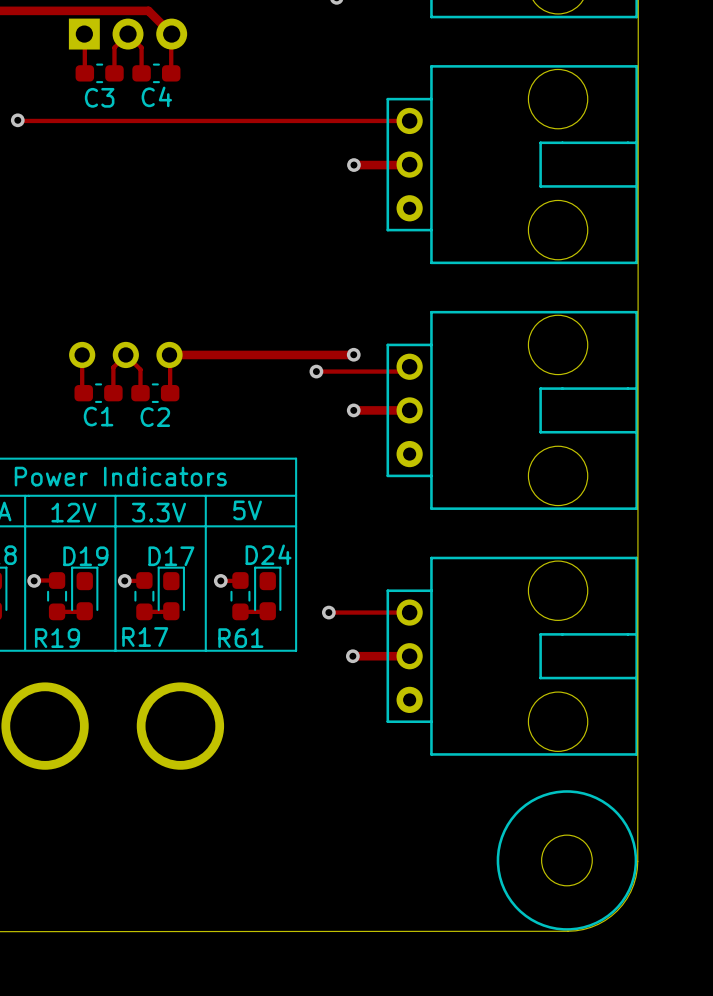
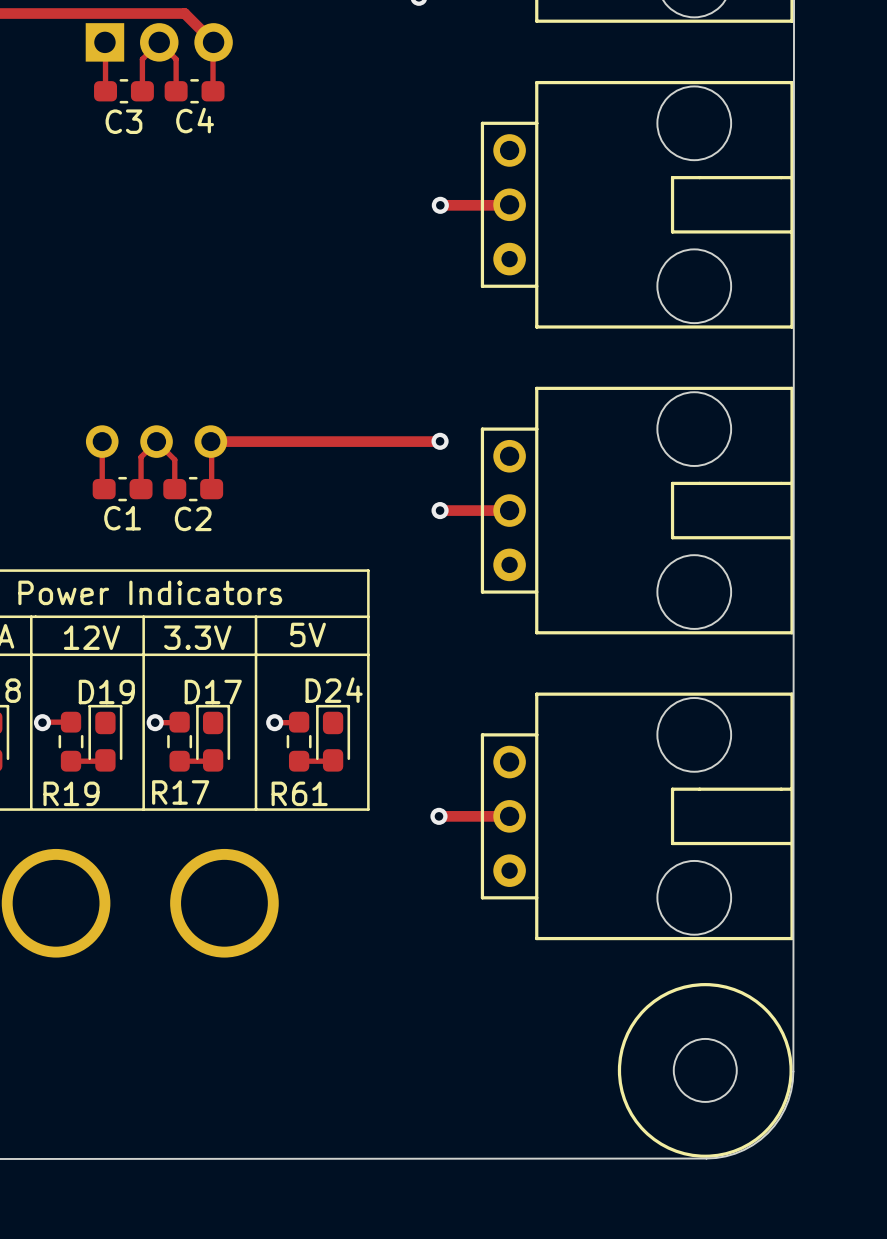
track: (17, 120) (409, 120) -> none
via: (17, 120) -> none
track: (316, 371) (404, 371) -> none
via: (316, 371) -> none
track: (328, 612) (409, 612) -> none
via: (328, 612) -> none

